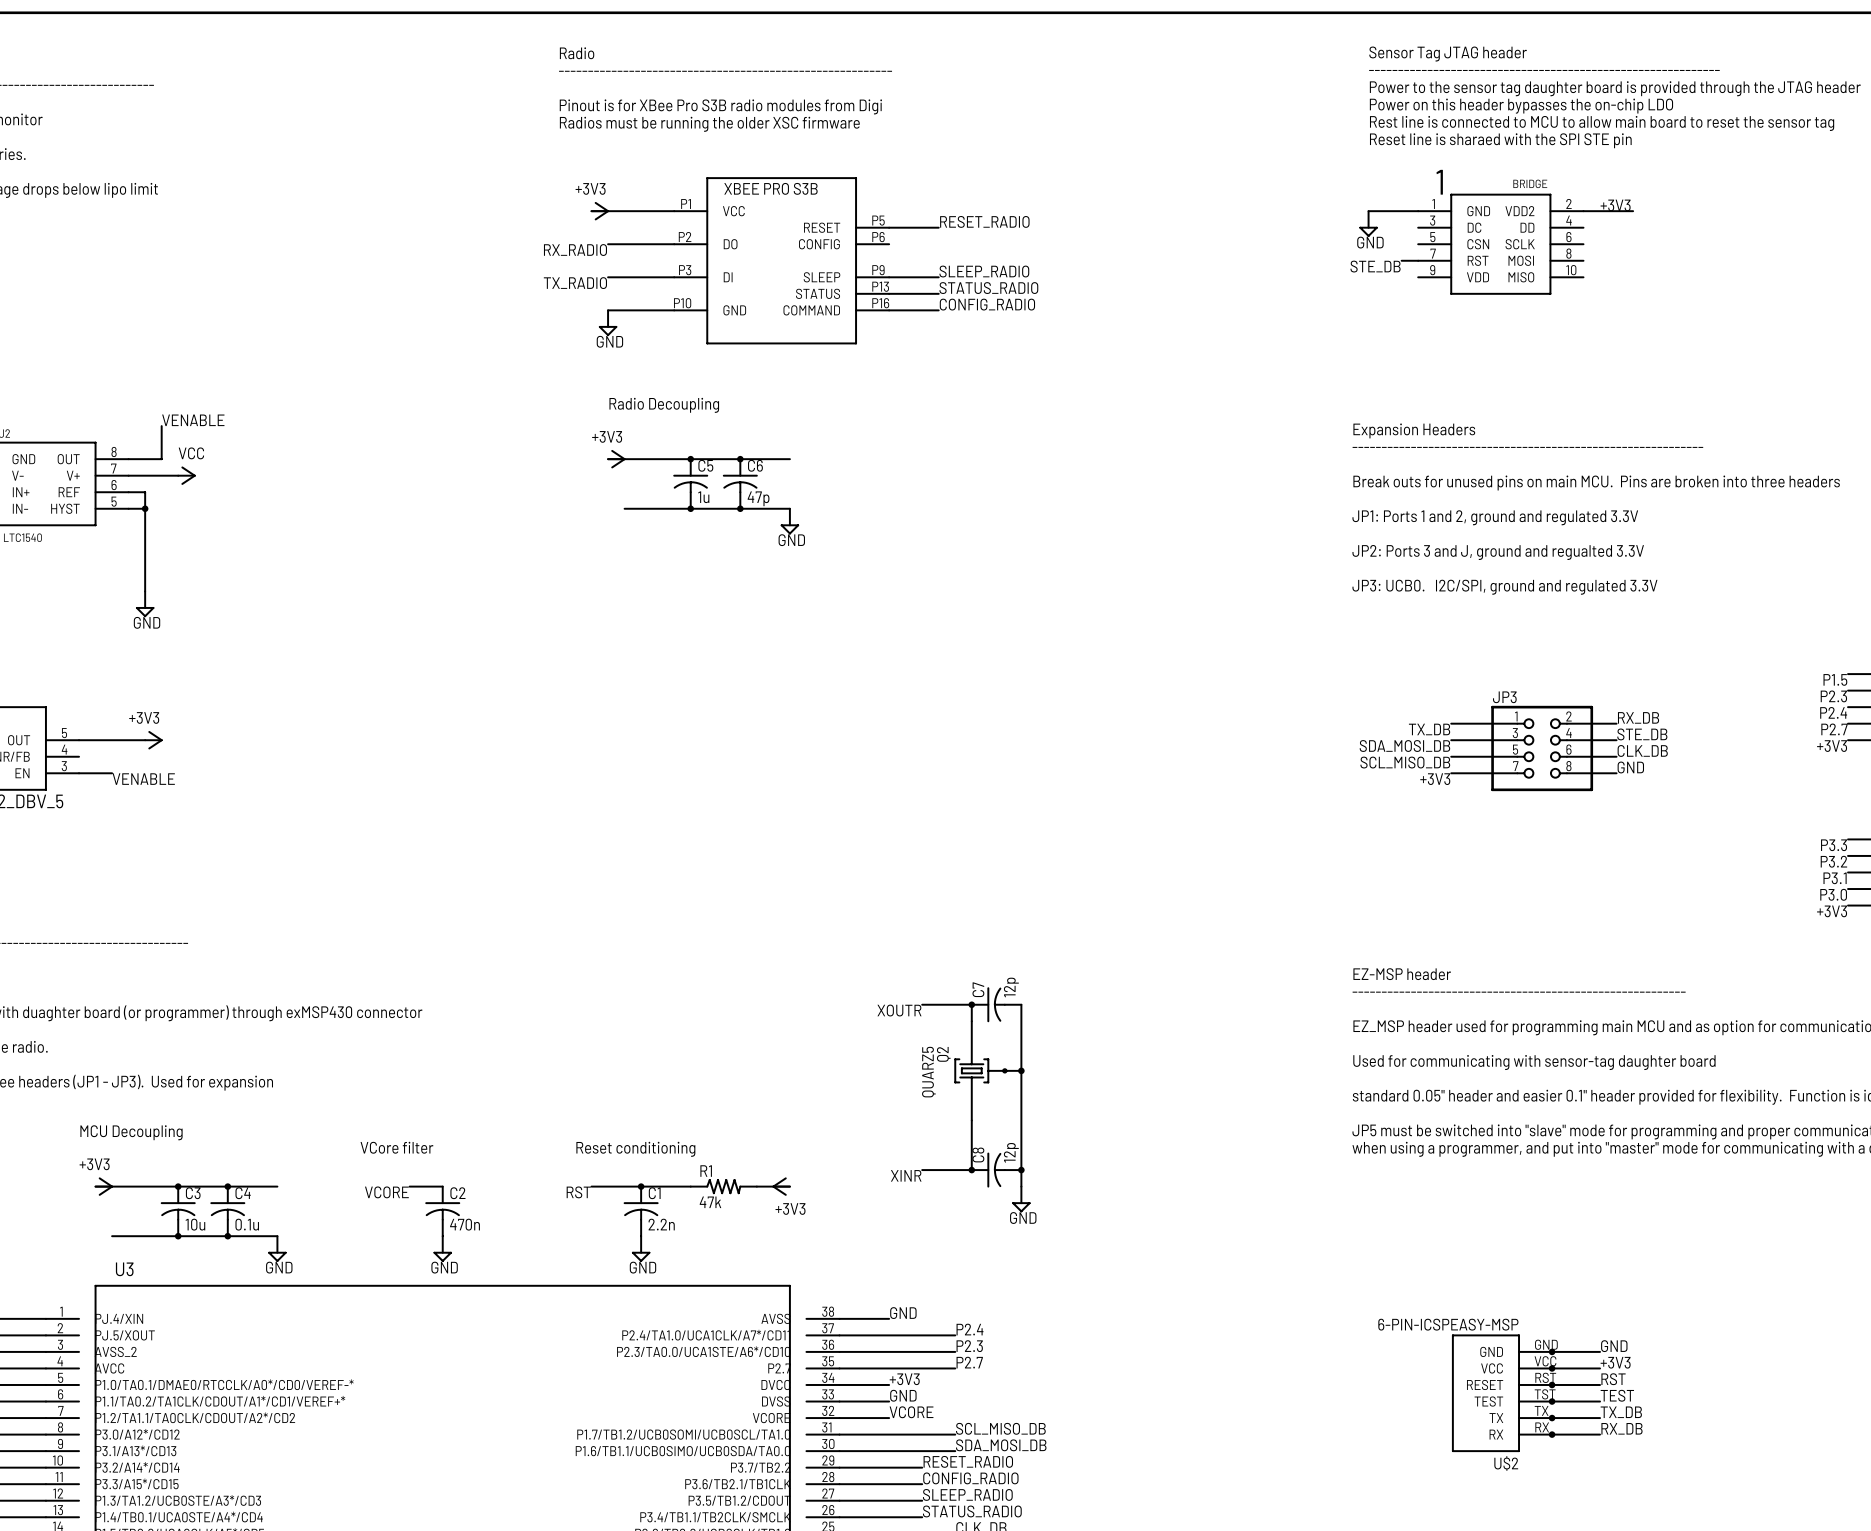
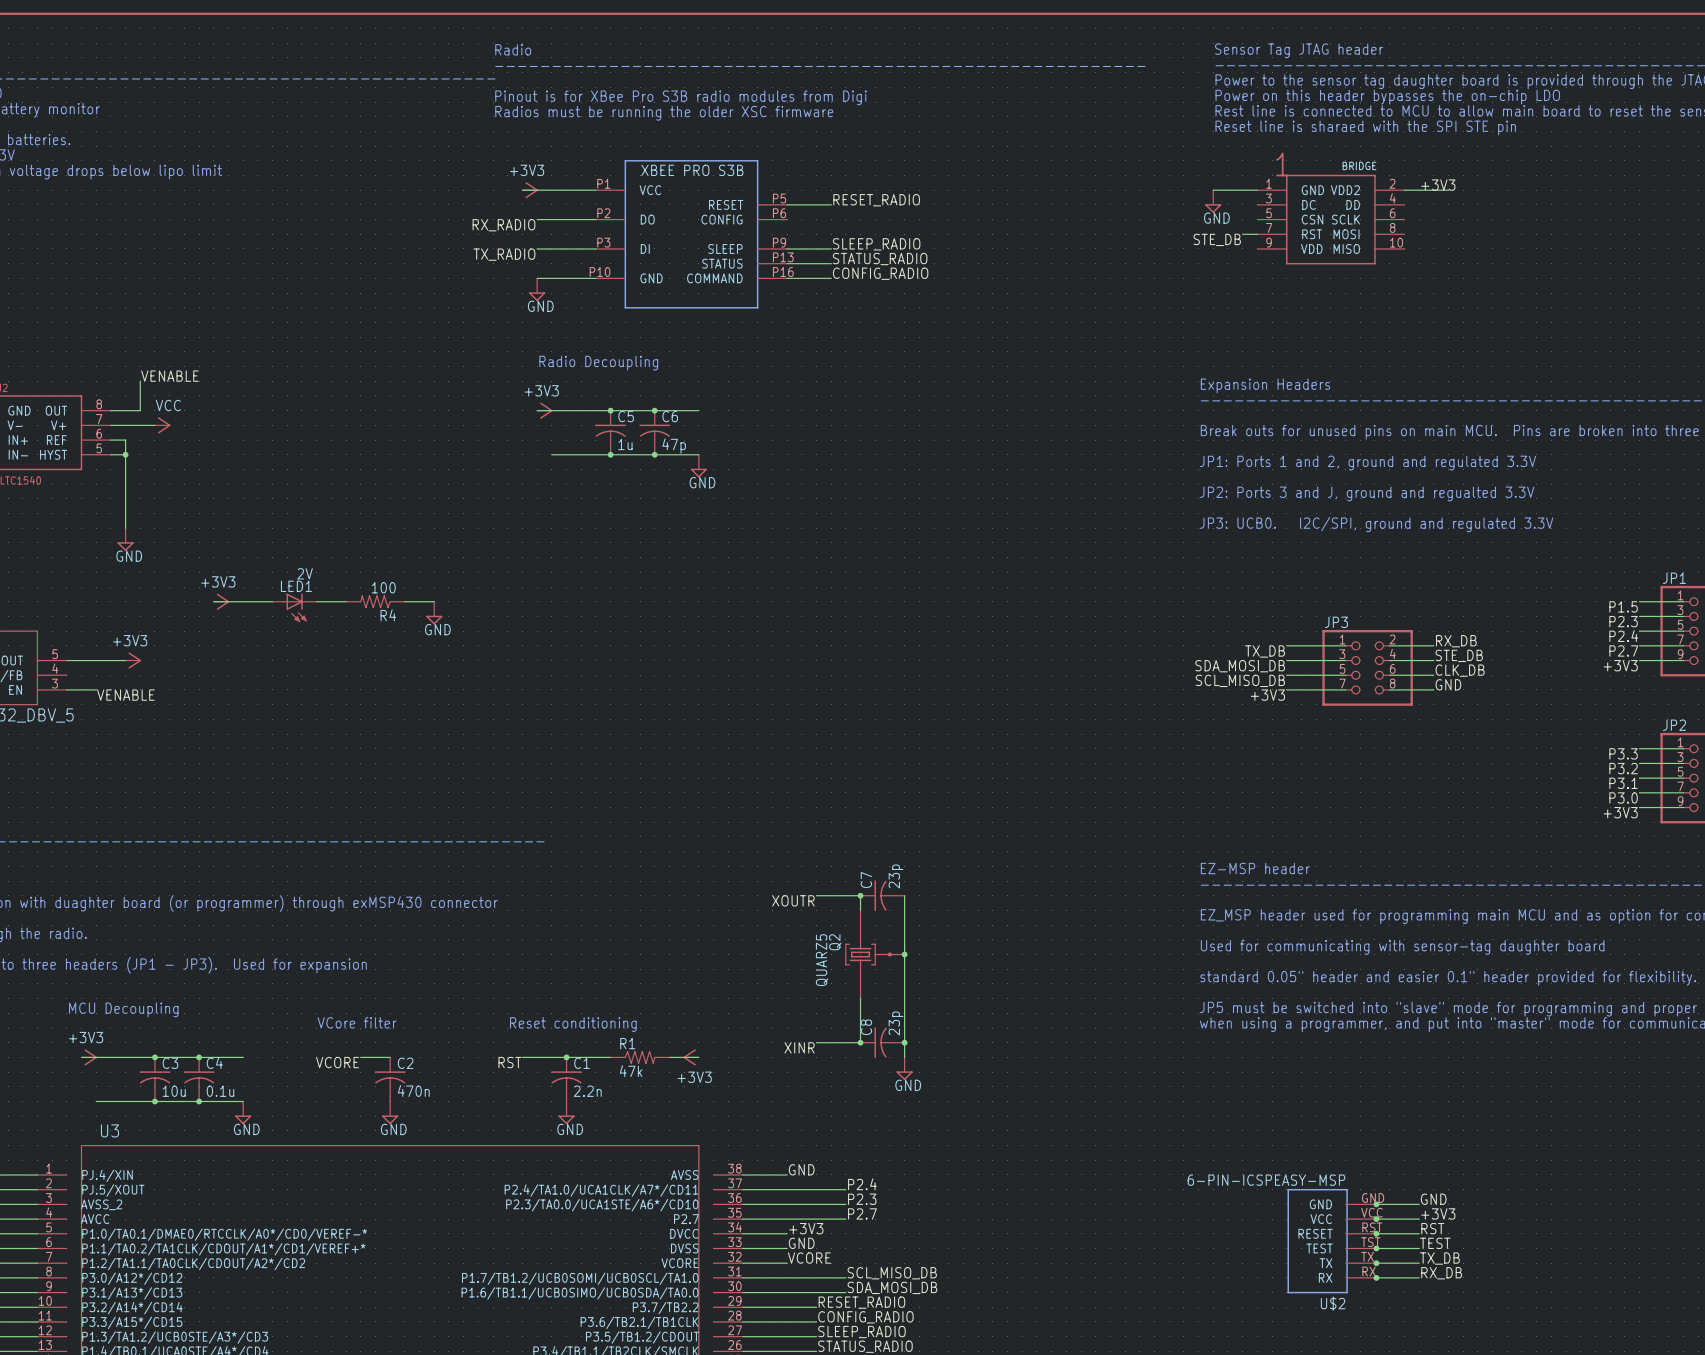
wire: none -> (213, 601) (272, 601)
power symbol: none -> +3V3 (221, 601)
wire: none -> (316, 601) (346, 601)
R4: none -> 100 (375, 601)
wire: none -> (404, 601) (434, 601)
LED1: none -> 2V (294, 607)
power symbol: none -> GND (434, 613)
C7 value: 12p (1011, 987) -> 23p (896, 876)
C8 value: 12p (1011, 1152) -> 23p (896, 1023)

